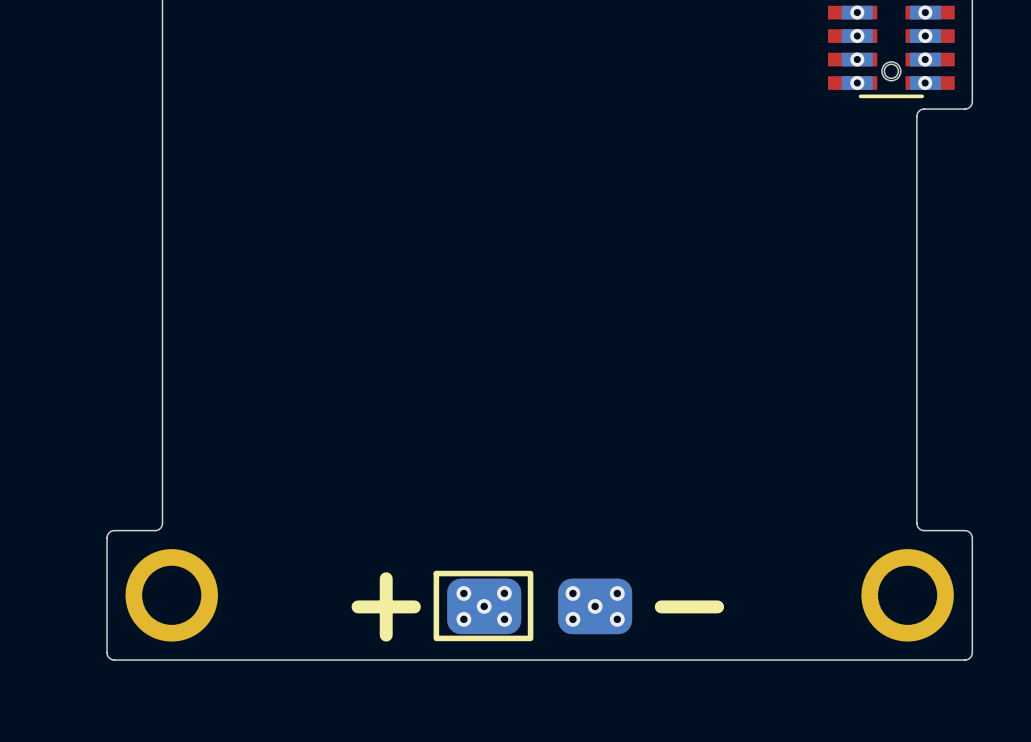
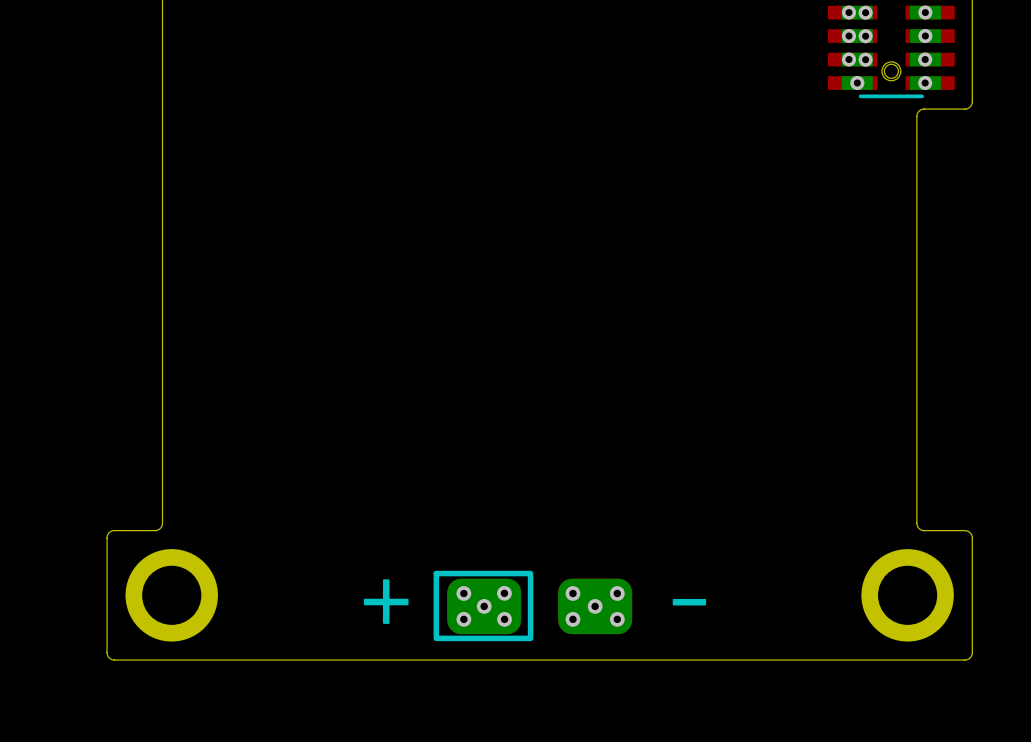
via: none -> (849, 12)
via: (857, 12) -> none
via: none -> (865, 12)
via: none -> (849, 36)
via: (857, 36) -> none
via: none -> (865, 36)
via: none -> (849, 59)
via: (857, 59) -> none
via: none -> (865, 59)

